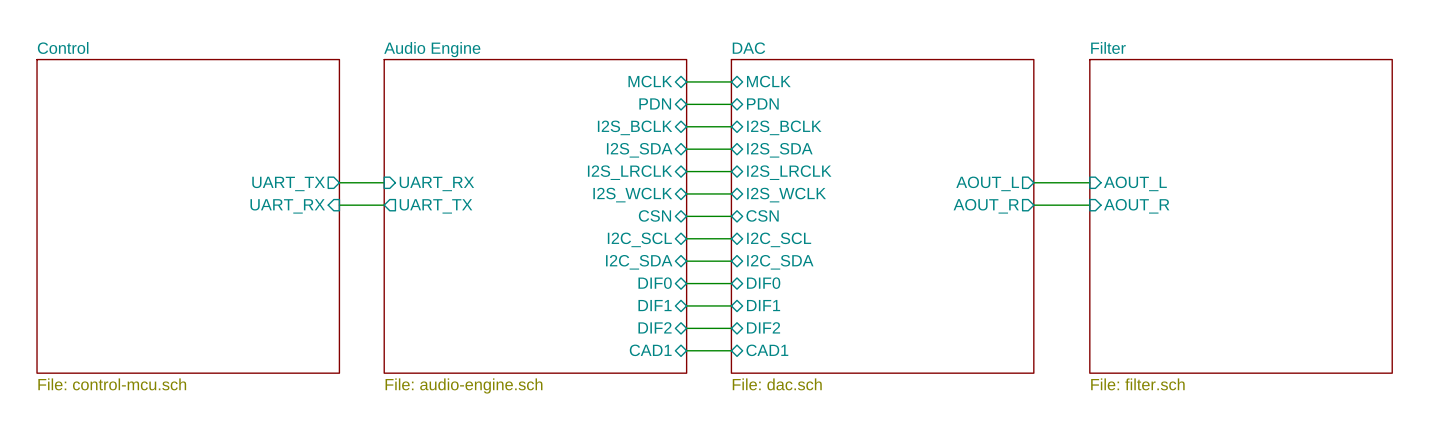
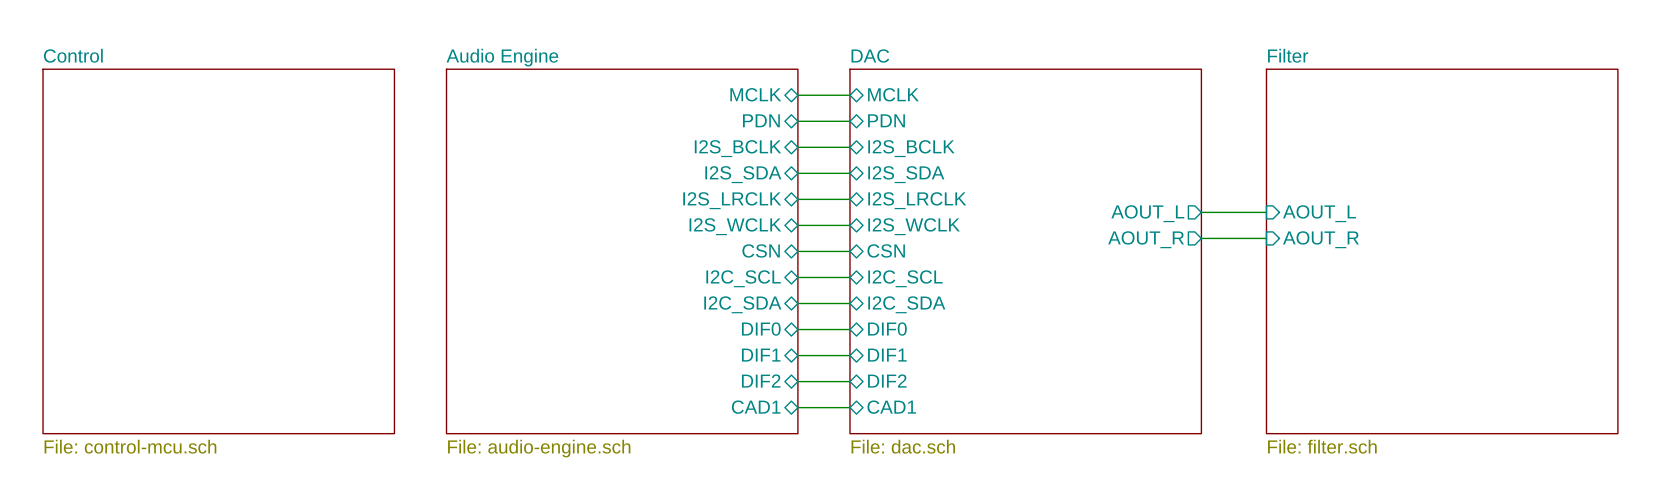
wire: (339, 182) (384, 182) -> none
sheet pin: UART_TX (288, 183) -> none
sheet pin: UART_RX (436, 183) -> none
wire: (339, 205) (384, 205) -> none
sheet pin: UART_RX (287, 206) -> none
sheet pin: UART_TX (435, 206) -> none

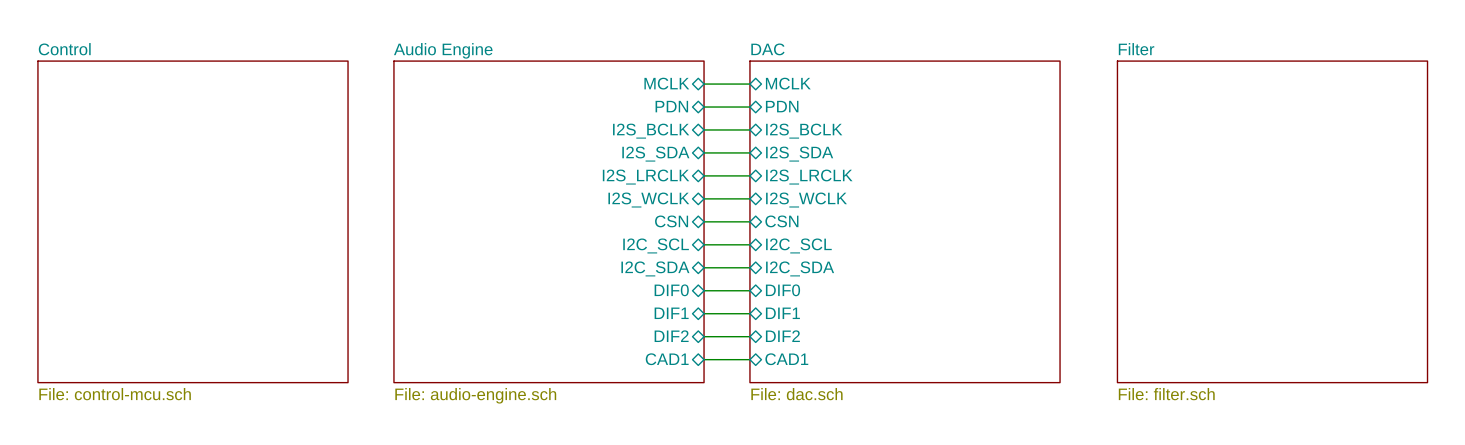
wire: (1201, 212) (1266, 212) -> none
sheet pin: AOUT_L (1147, 213) -> none
sheet pin: AOUT_L (1319, 213) -> none
wire: (1201, 238) (1266, 238) -> none
sheet pin: AOUT_R (1146, 239) -> none
sheet pin: AOUT_R (1320, 239) -> none

